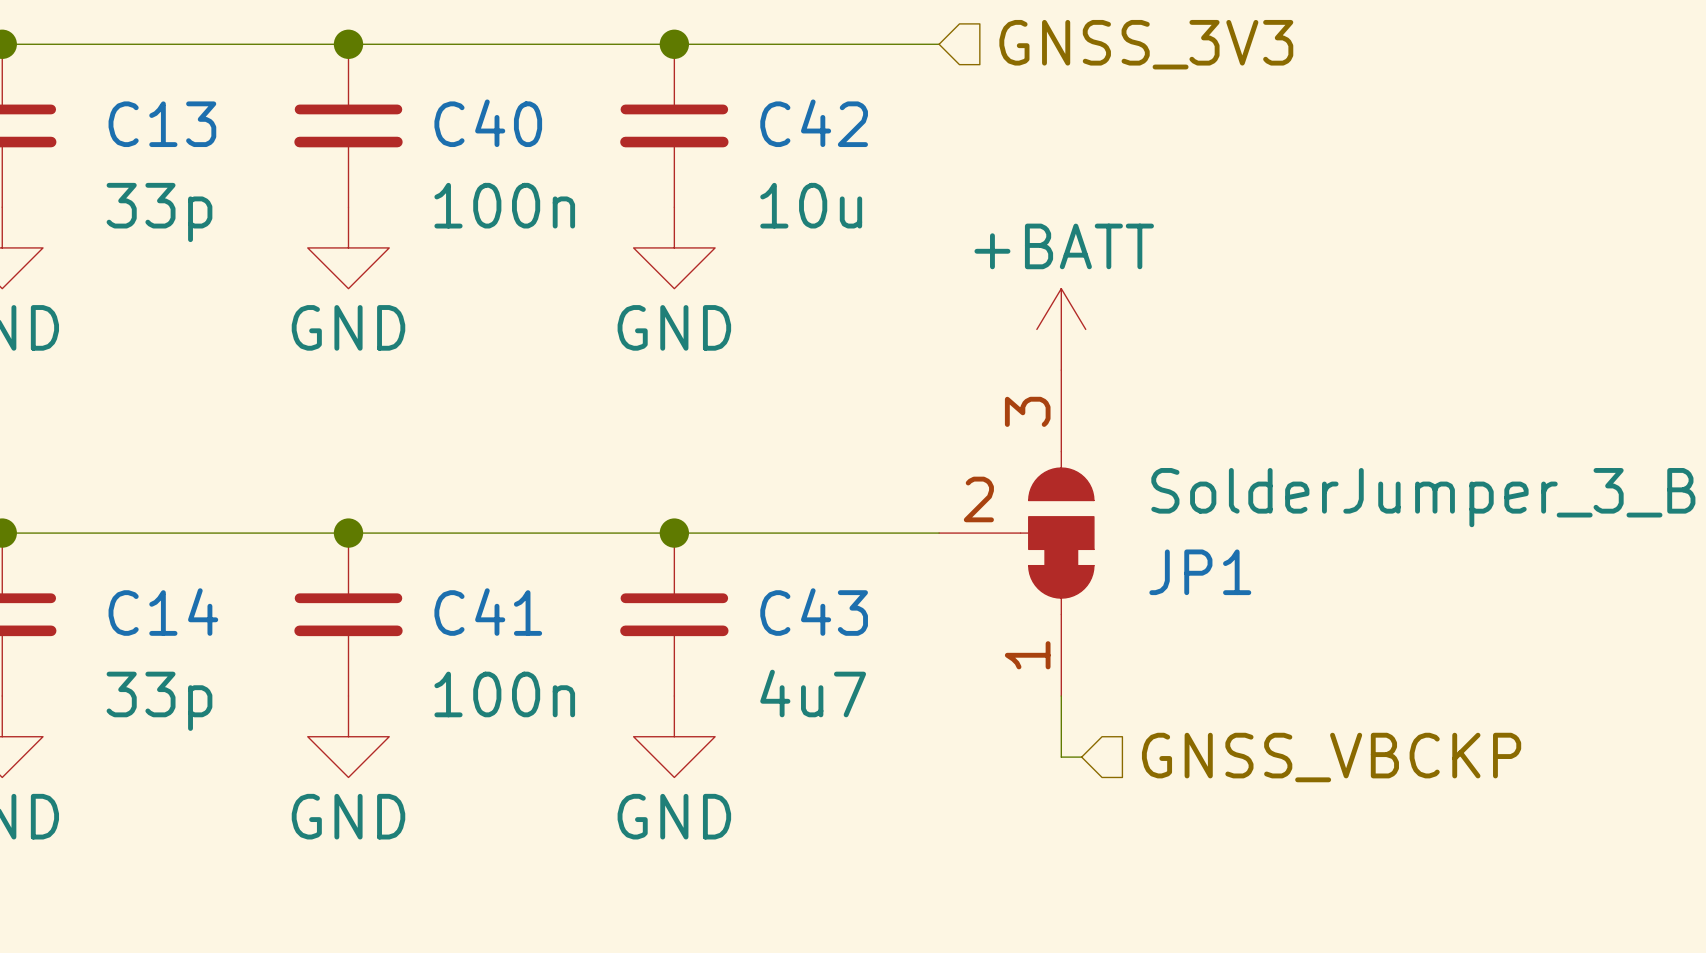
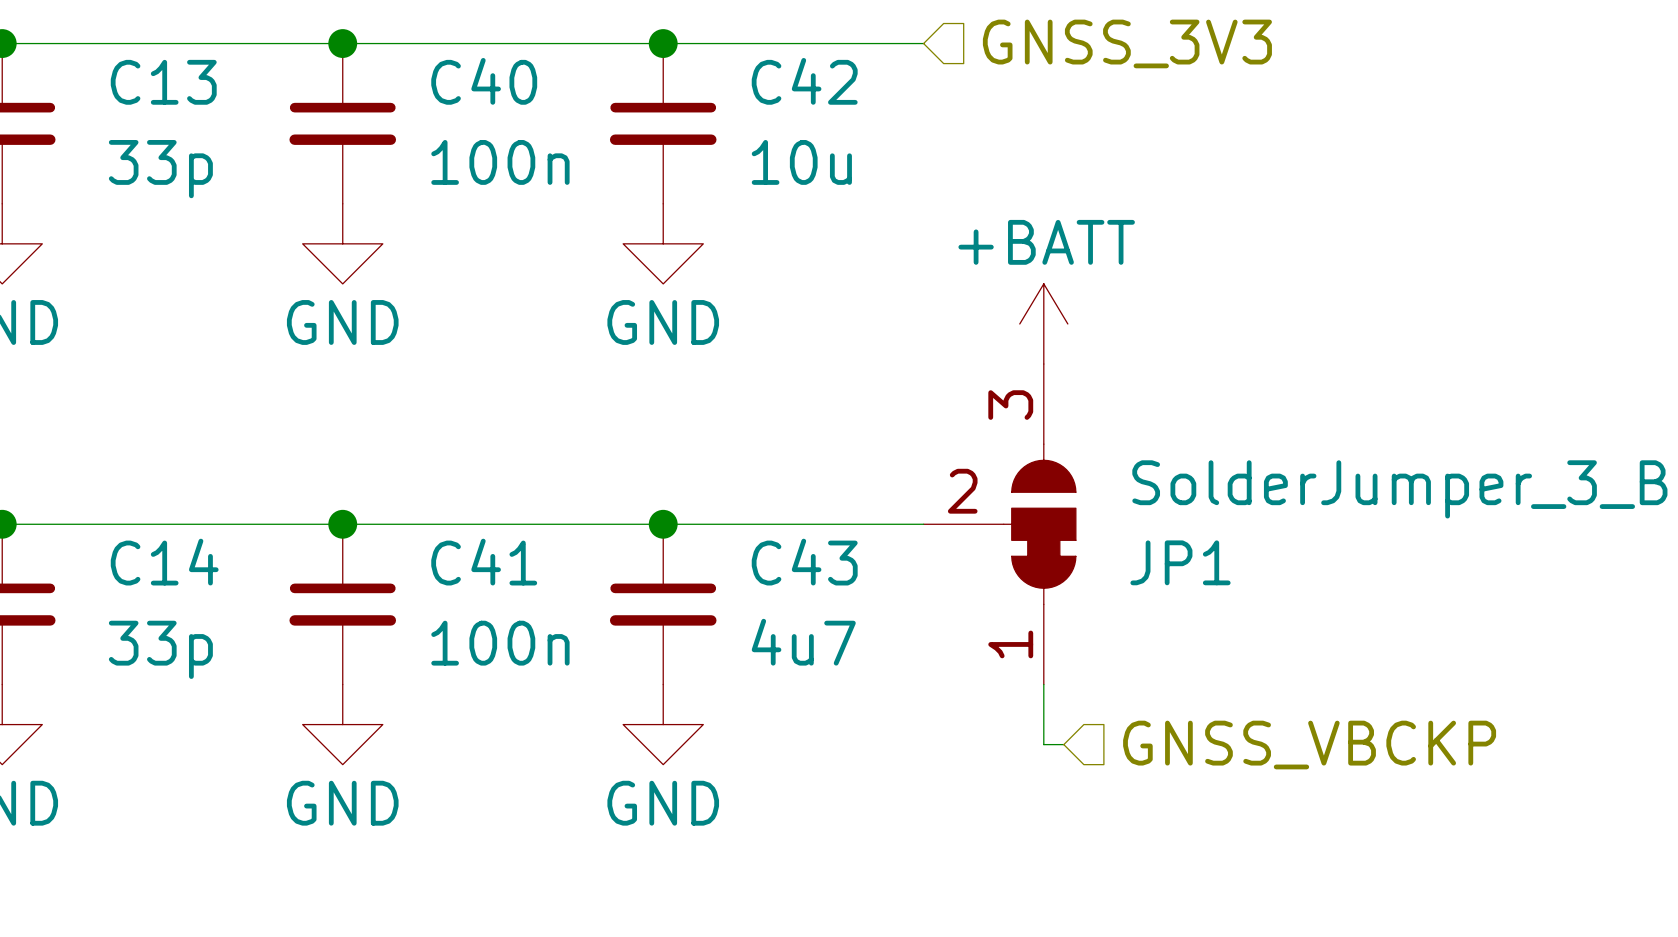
C40 name position: C40 (488, 123) -> C40 (484, 81)
C42 name position: C42 (814, 123) -> C42 (804, 81)
C13 name position: C13 (162, 124) -> C13 (163, 82)
C40 value position: 100n (504, 205) -> 100n (500, 162)
C42 value position: 10u (811, 205) -> 10u (801, 162)
C13 value position: 33p (159, 212) -> 33p (160, 169)
C14 name position: C14 (163, 612) -> C14 (164, 562)
C41 name position: C41 (488, 612) -> C41 (484, 562)
C43 name position: C43 (814, 612) -> C43 (804, 562)
C43 value position: 4u7 (813, 693) -> 4u7 (803, 642)
C41 value position: 100n (504, 694) -> 100n (500, 643)
C14 value position: 33p (159, 701) -> 33p (160, 649)

